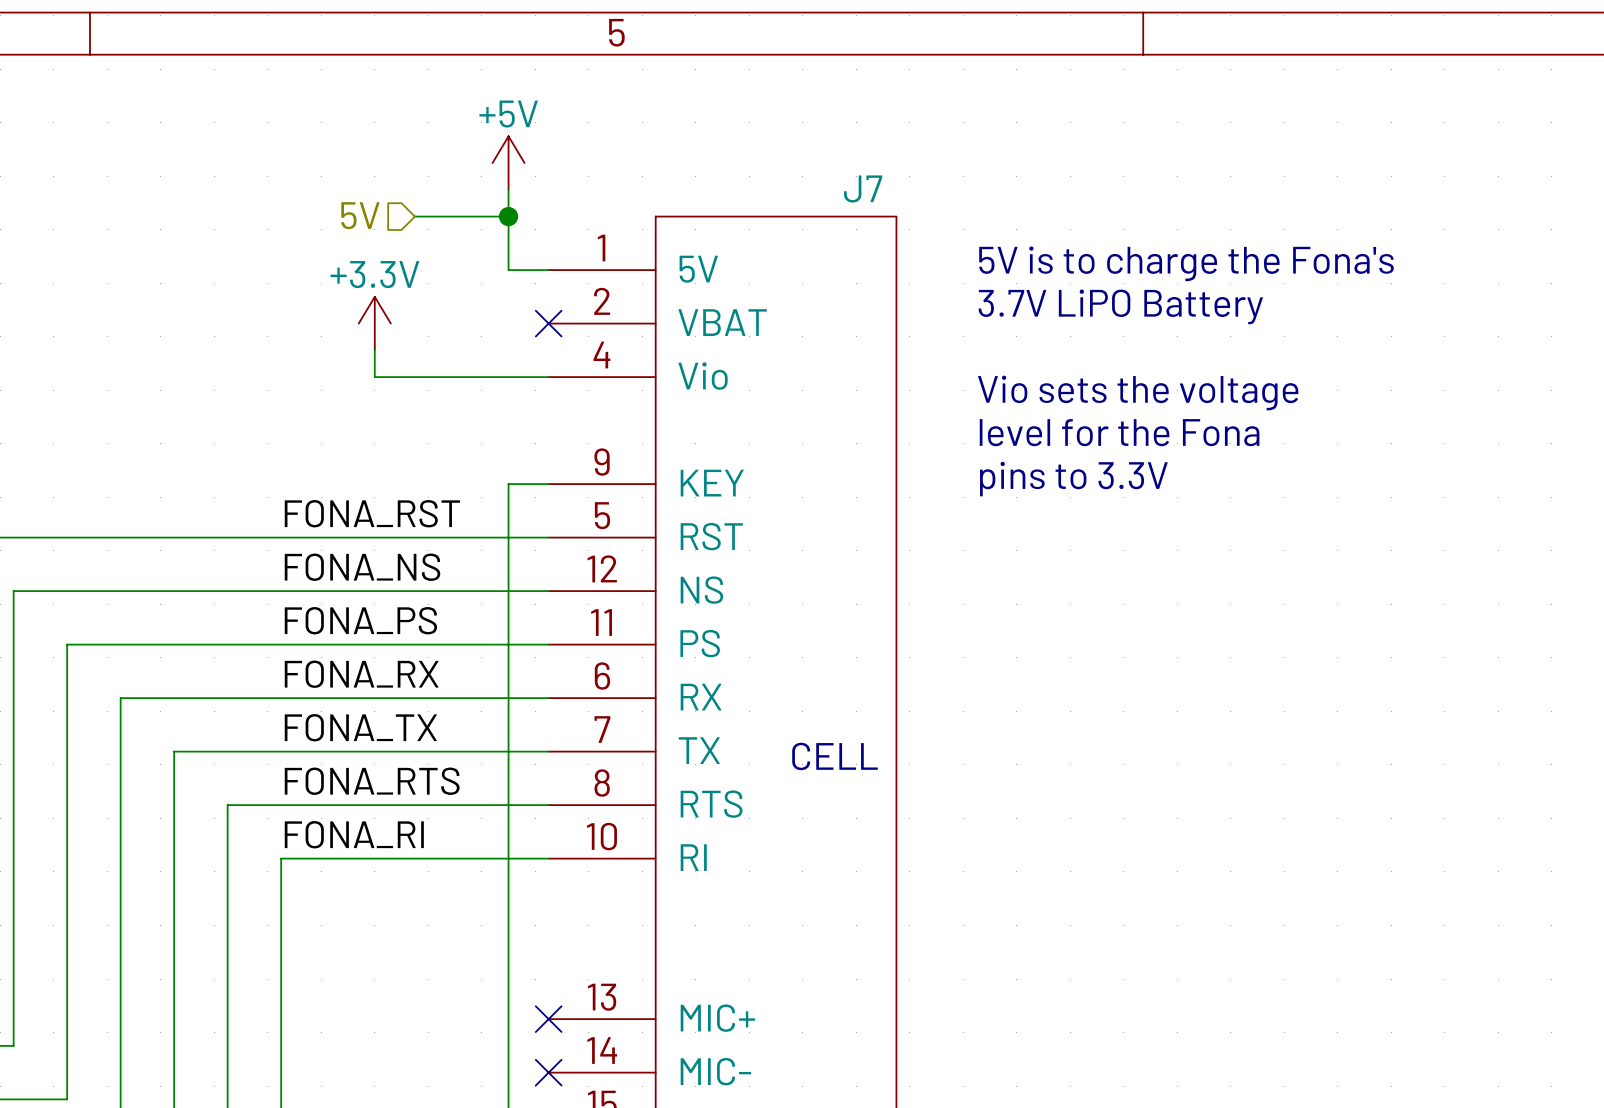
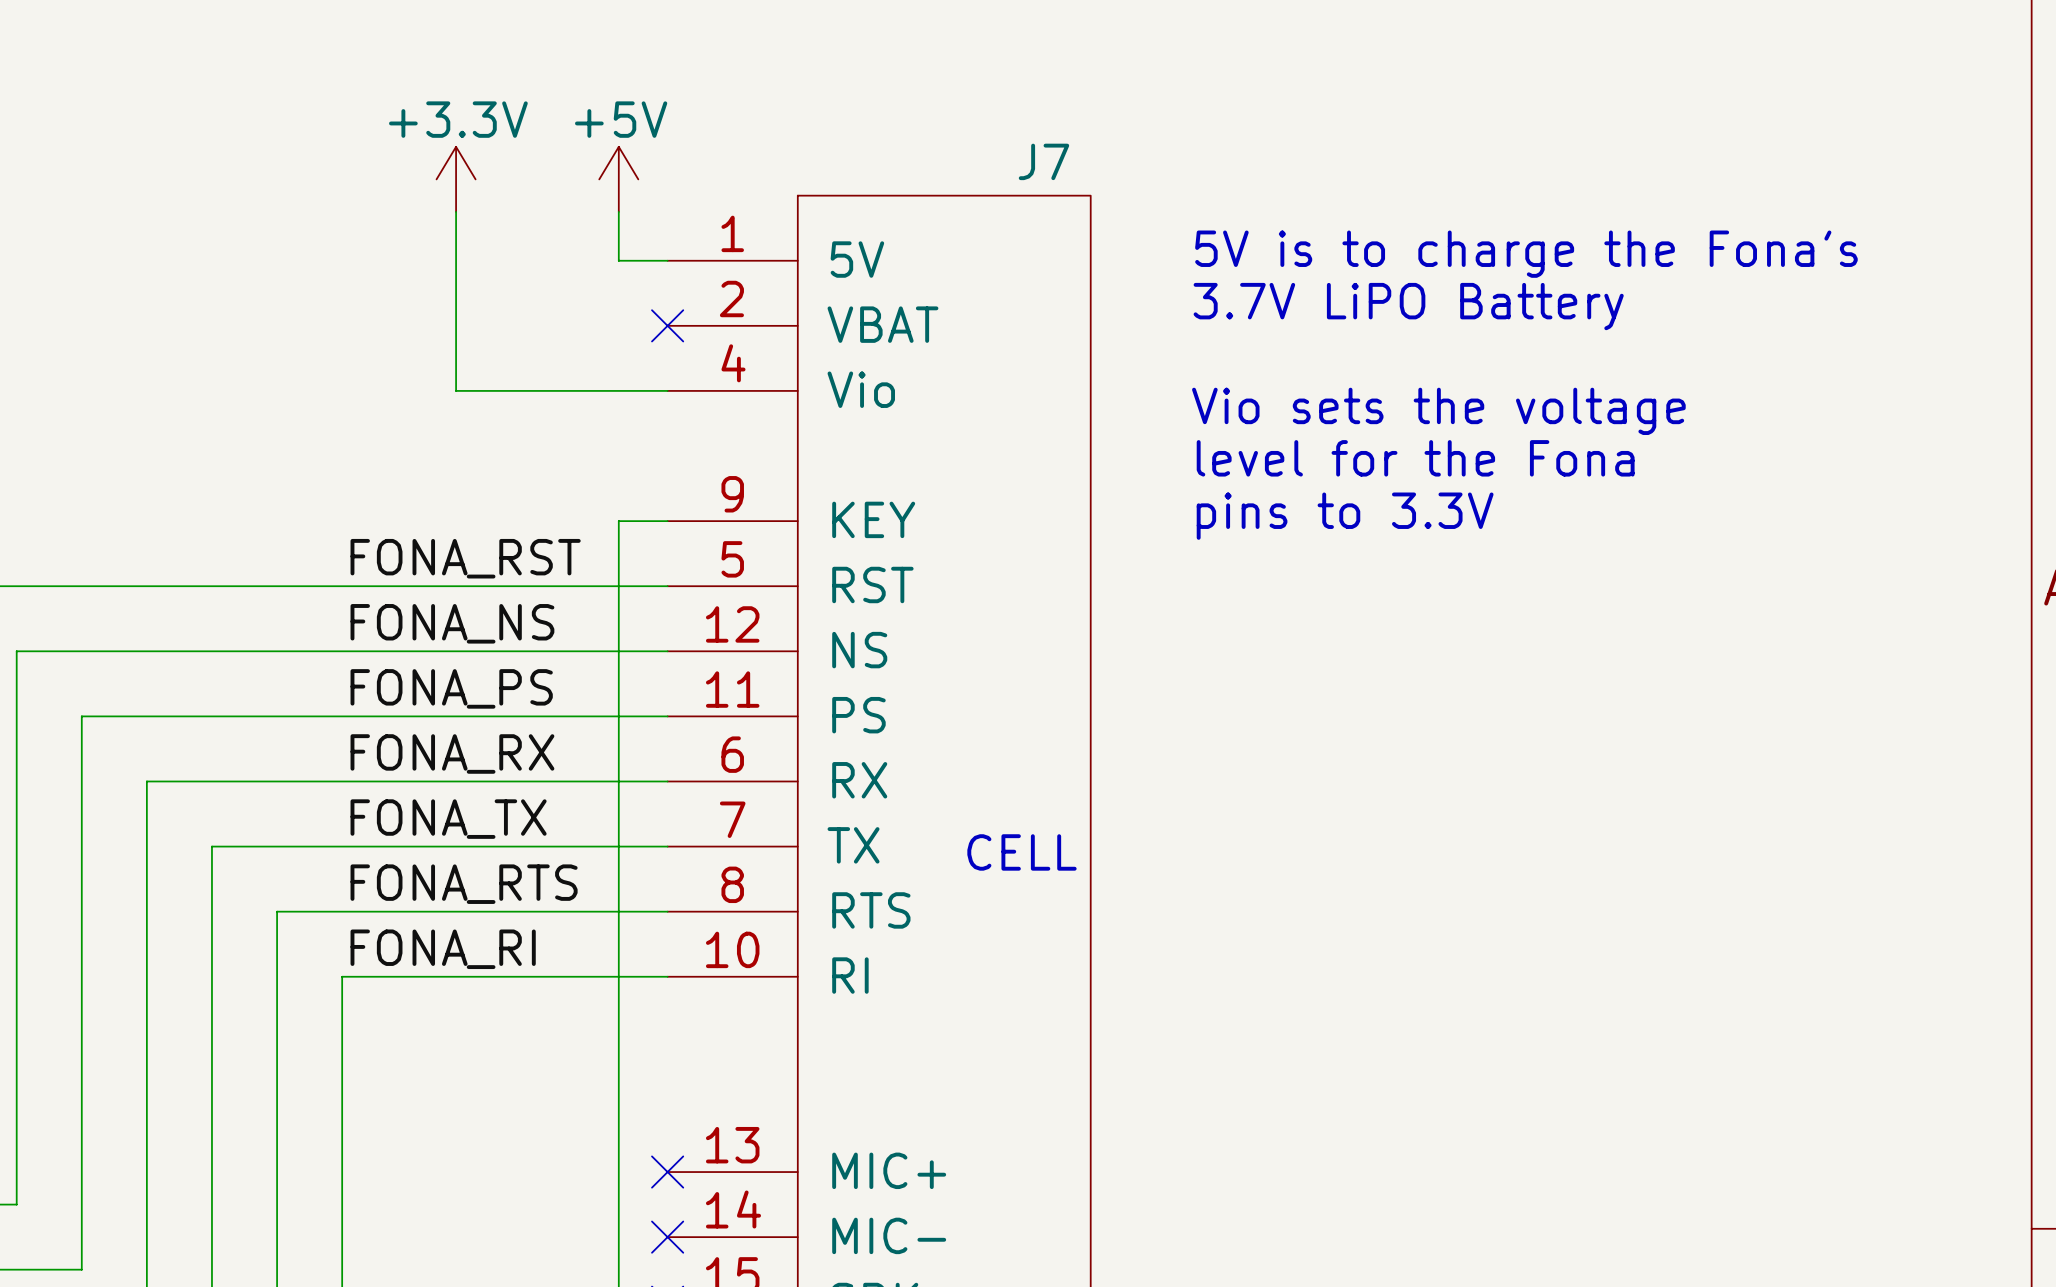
power symbol position: +5V (508, 163) -> +5V (618, 179)
hierarchical label: 5V (360, 215) -> none
wire: (414, 216) (508, 216) -> none
junction: (508, 216) -> none
wire: none -> (456, 211) (456, 358)
power symbol position: +3.3V (374, 323) -> +3.3V (456, 179)

